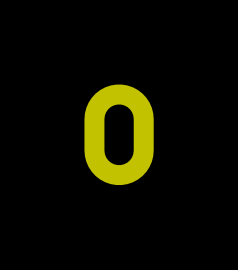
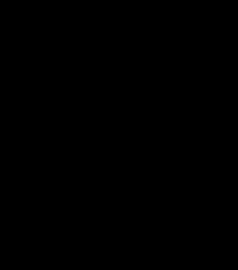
part: (119, 134) -> none

